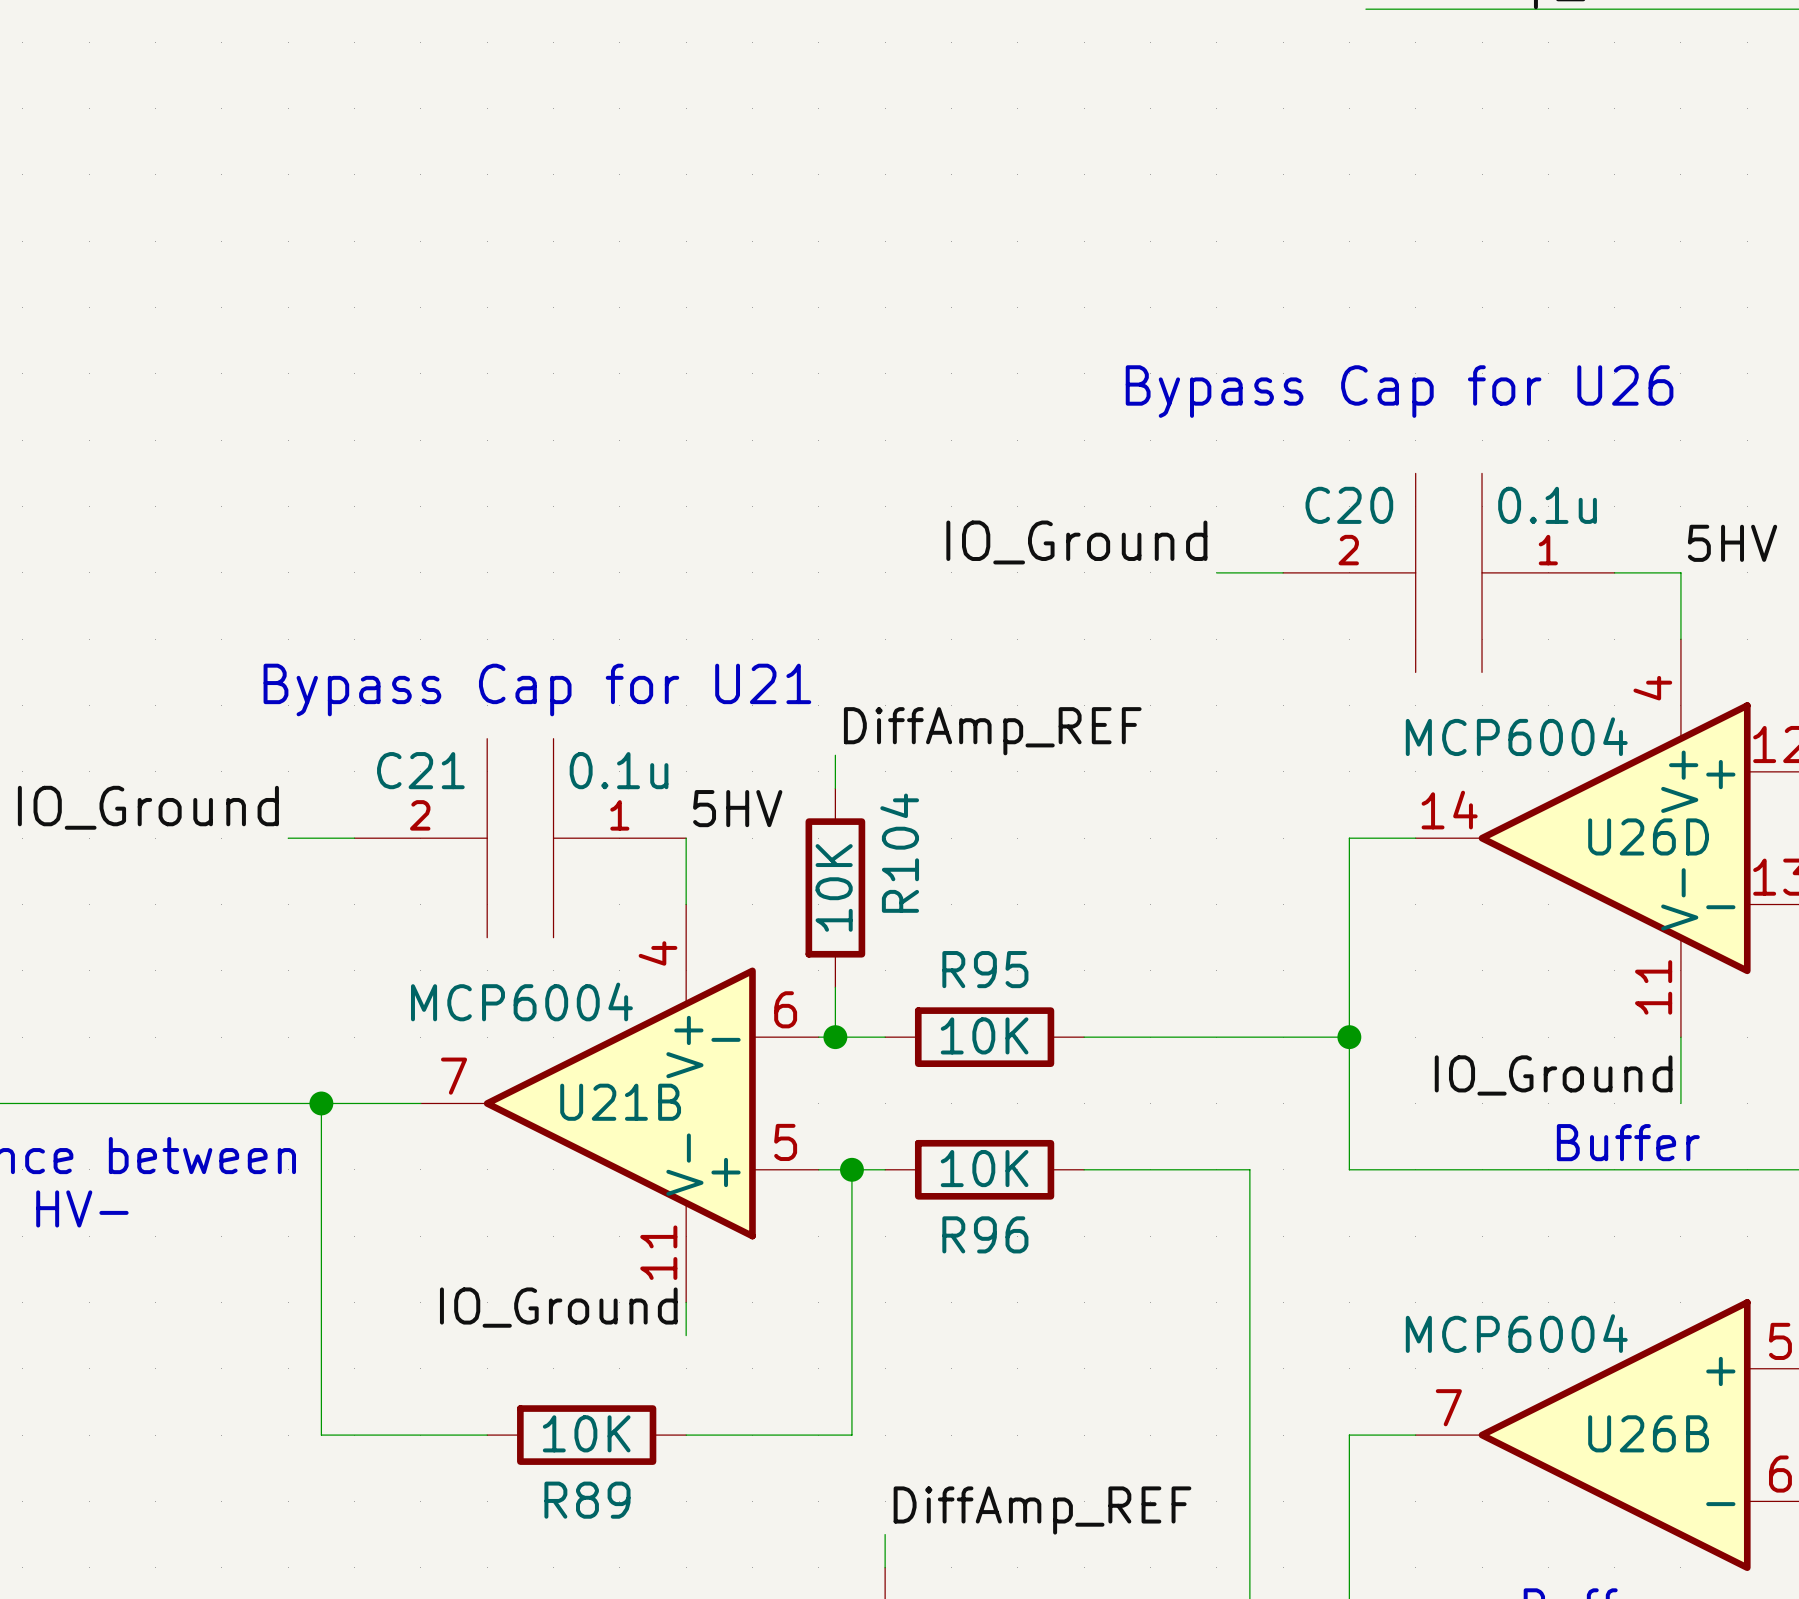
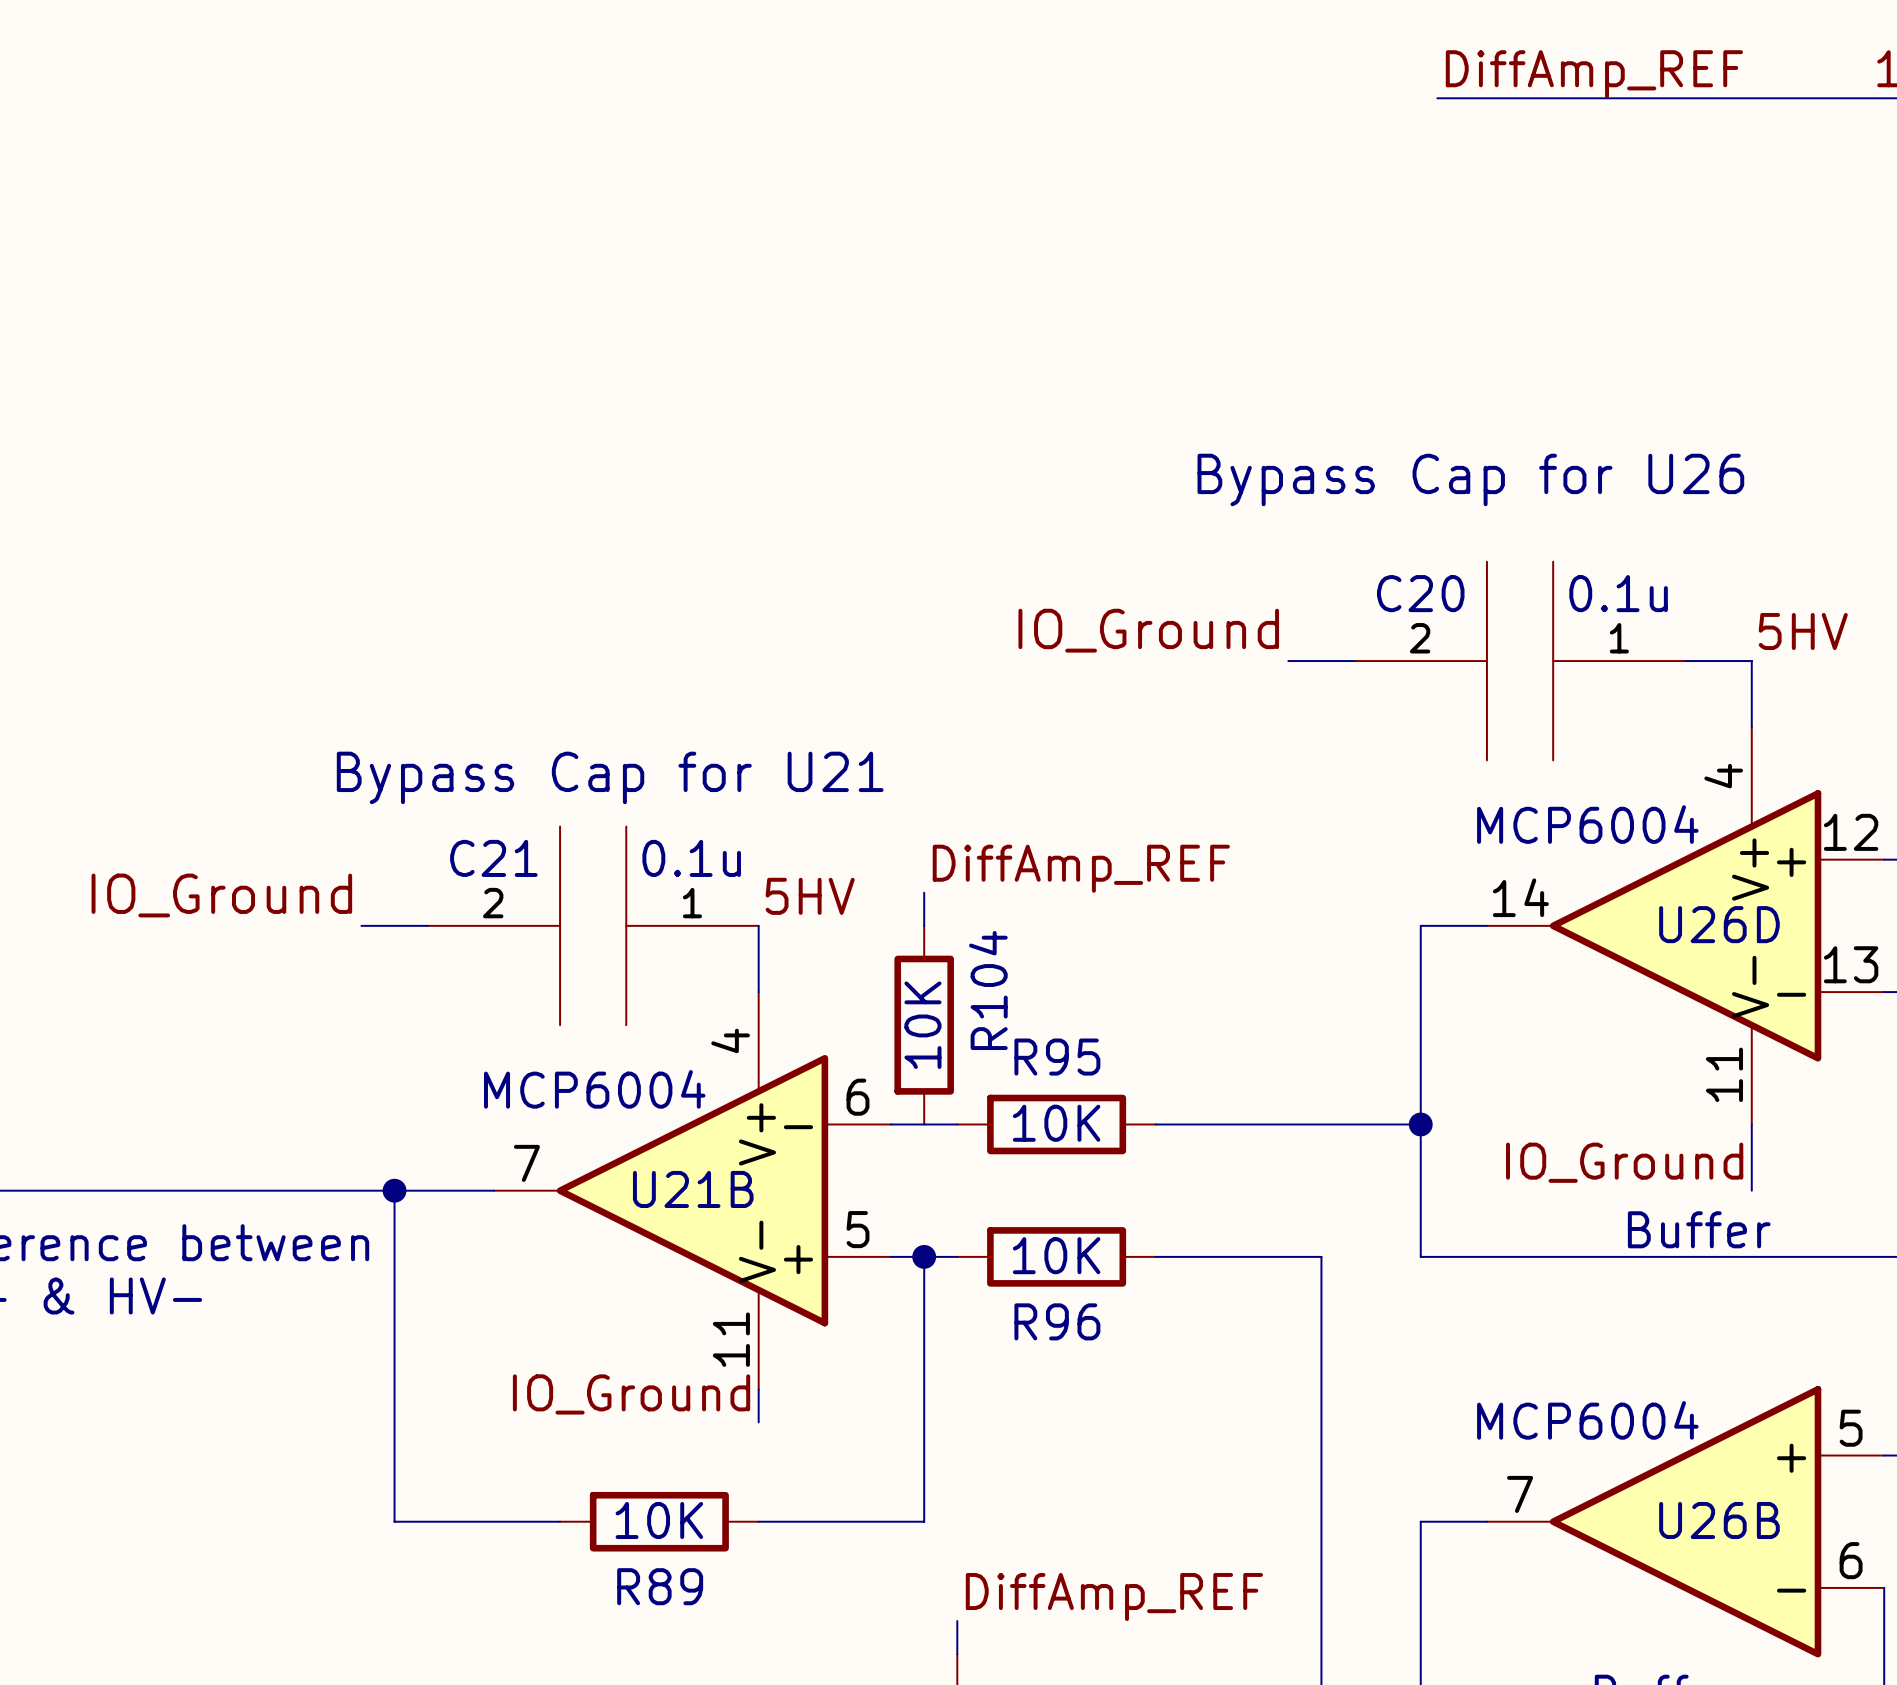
label position: DiffAmp_REF (992, 731) -> DiffAmp_REF (1081, 868)
wire: (835, 755) (835, 788) -> (924, 892) (924, 925)
R104 position: (835, 887) -> (924, 1025)
wire: (835, 987) (835, 1037) -> none
junction: (835, 1037) -> none

